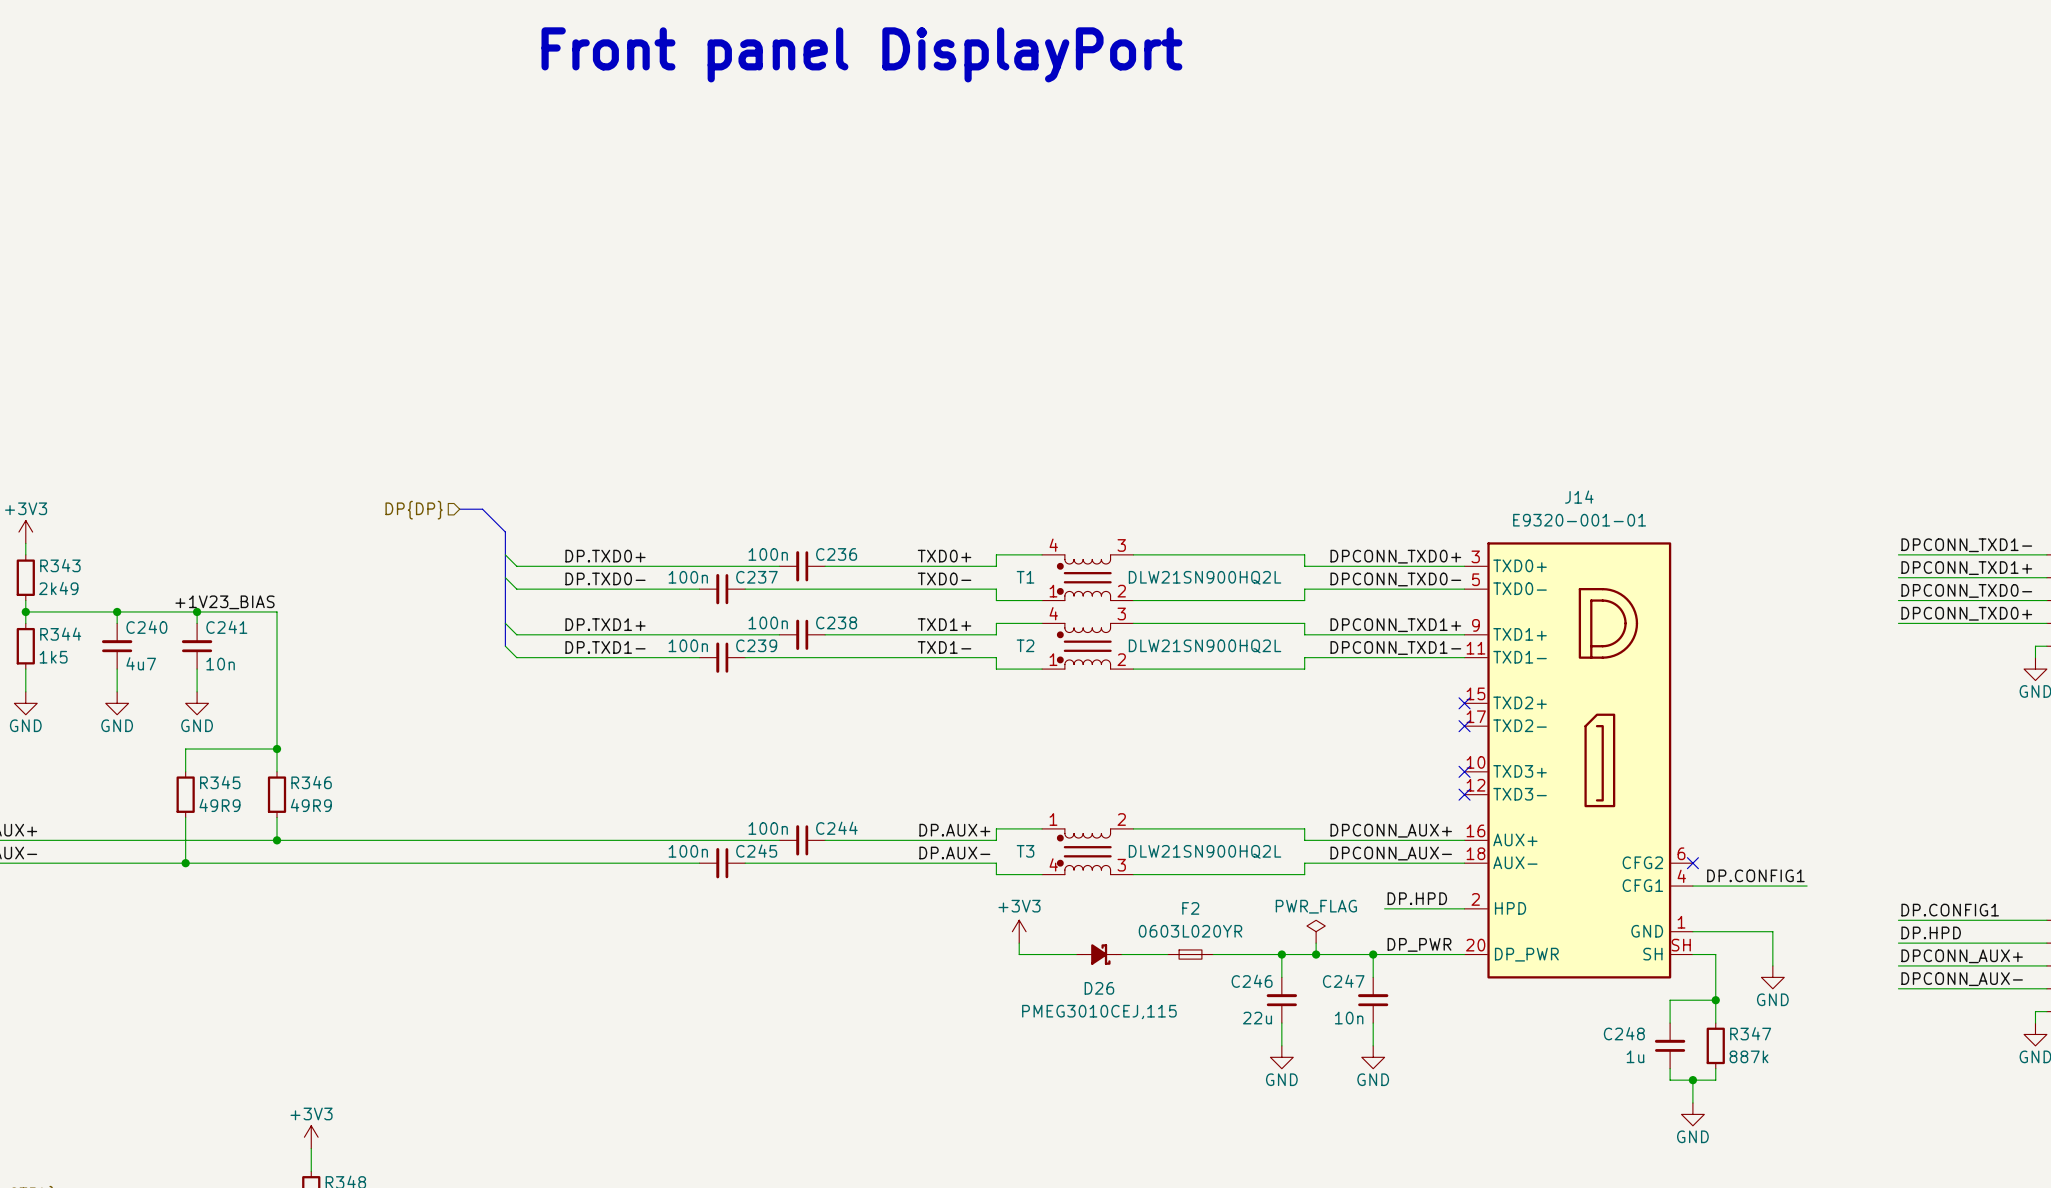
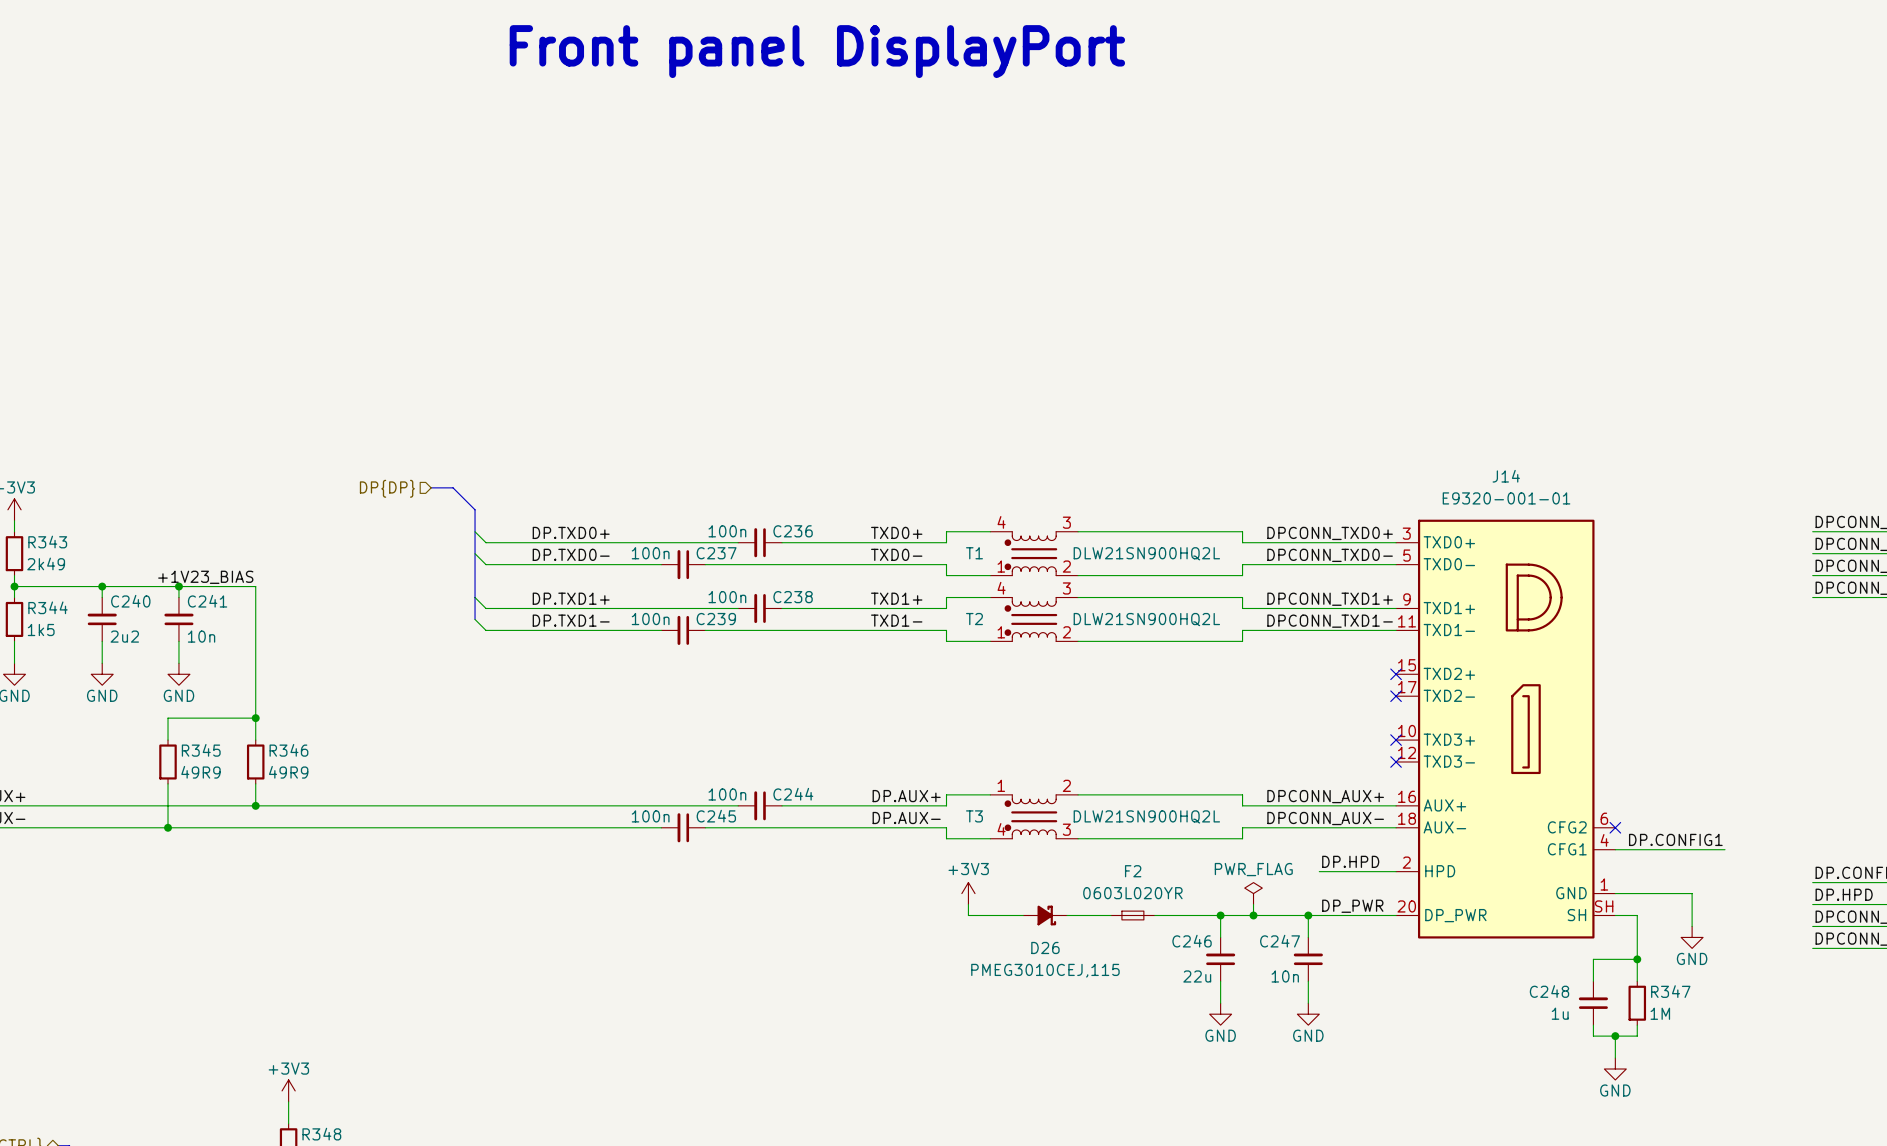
C240 text: 4u7 (141, 663) -> 2u2 (124, 636)
R347 text: 887k (1749, 1056) -> 1M (1660, 1013)

